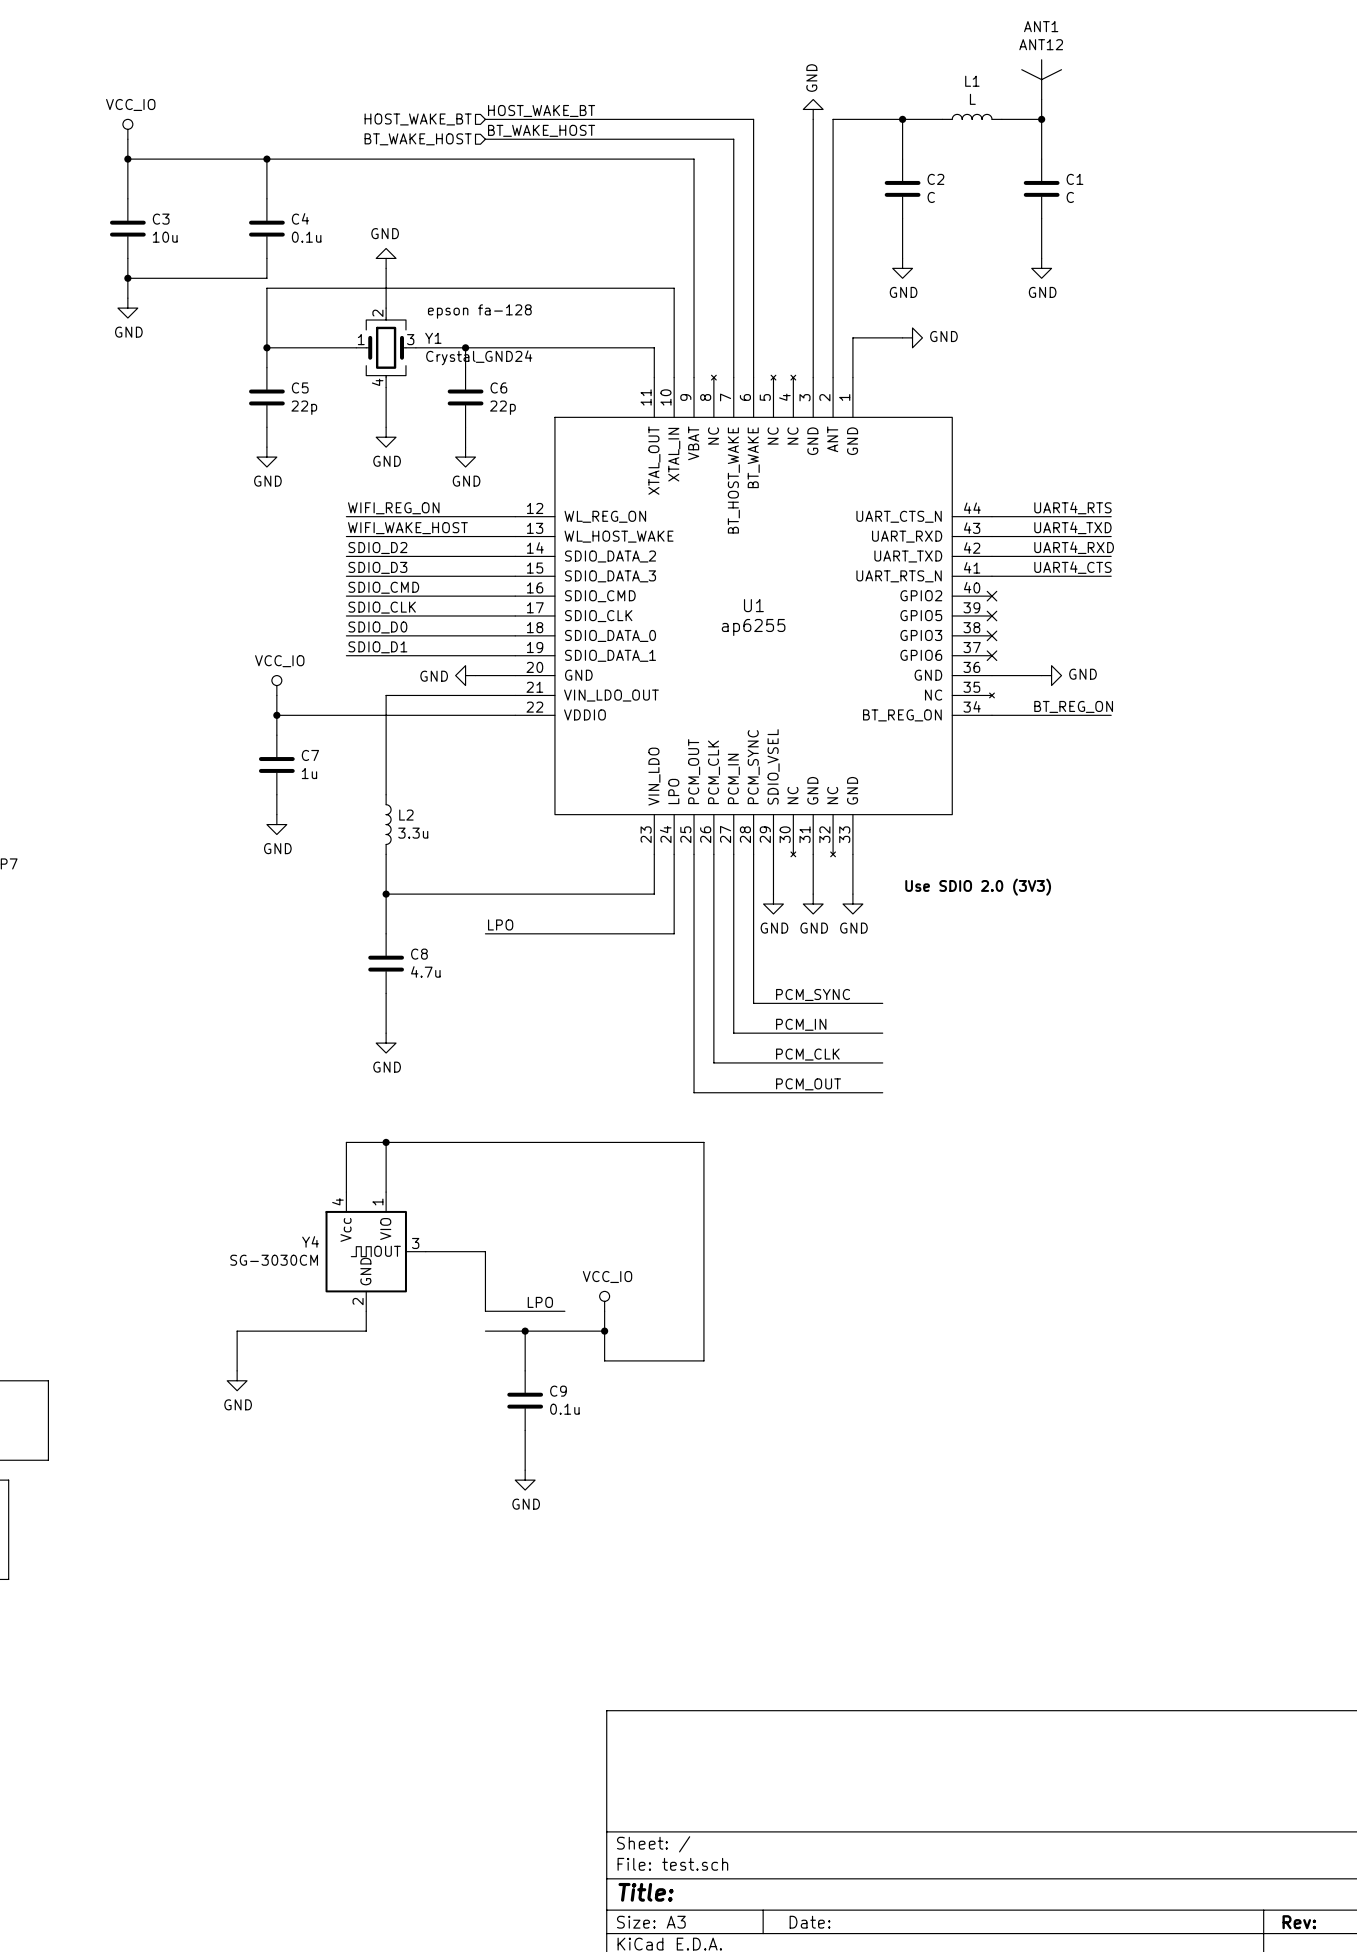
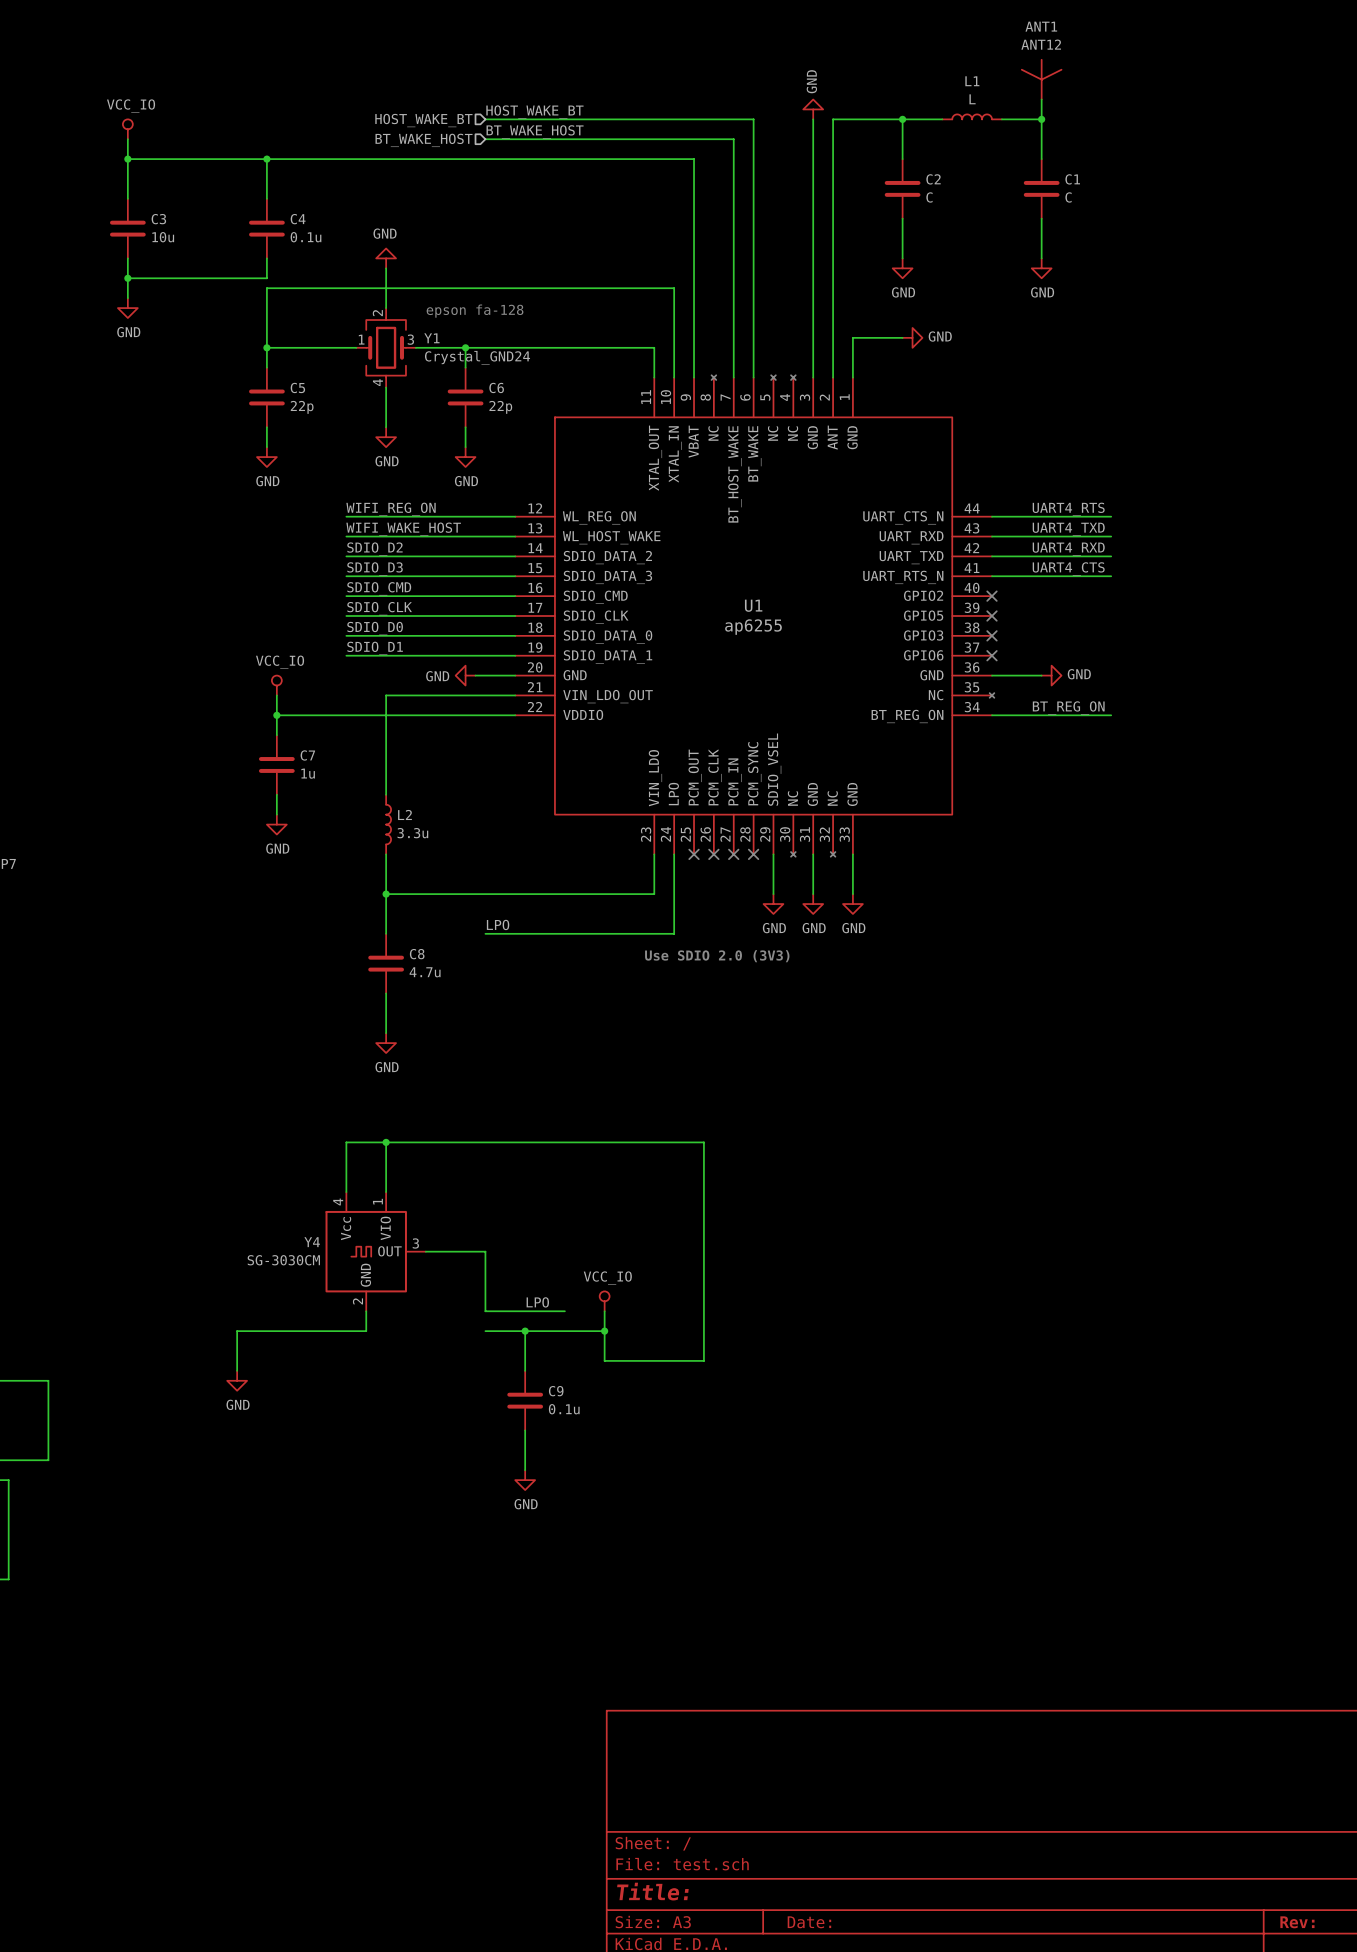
wire: (694, 854) (694, 1092) (882, 1092) -> none
no-connect mark: none -> (694, 854)
wire: (713, 854) (713, 1062) (882, 1062) -> none
no-connect mark: none -> (713, 854)
wire: (733, 854) (733, 1033) (882, 1033) -> none
no-connect mark: none -> (733, 854)
wire: (753, 854) (753, 1003) (882, 1003) -> none
no-connect mark: none -> (753, 854)
text: Use SDIO 2.0 (3V3) (978, 887) -> none
text: none -> Use SDIO 2.0 (3V3) (717, 956)
label: PCM_SYNC (813, 994) -> none
label: PCM_IN (801, 1024) -> none
label: PCM_CLK (807, 1054) -> none
label: PCM_OUT (808, 1084) -> none

